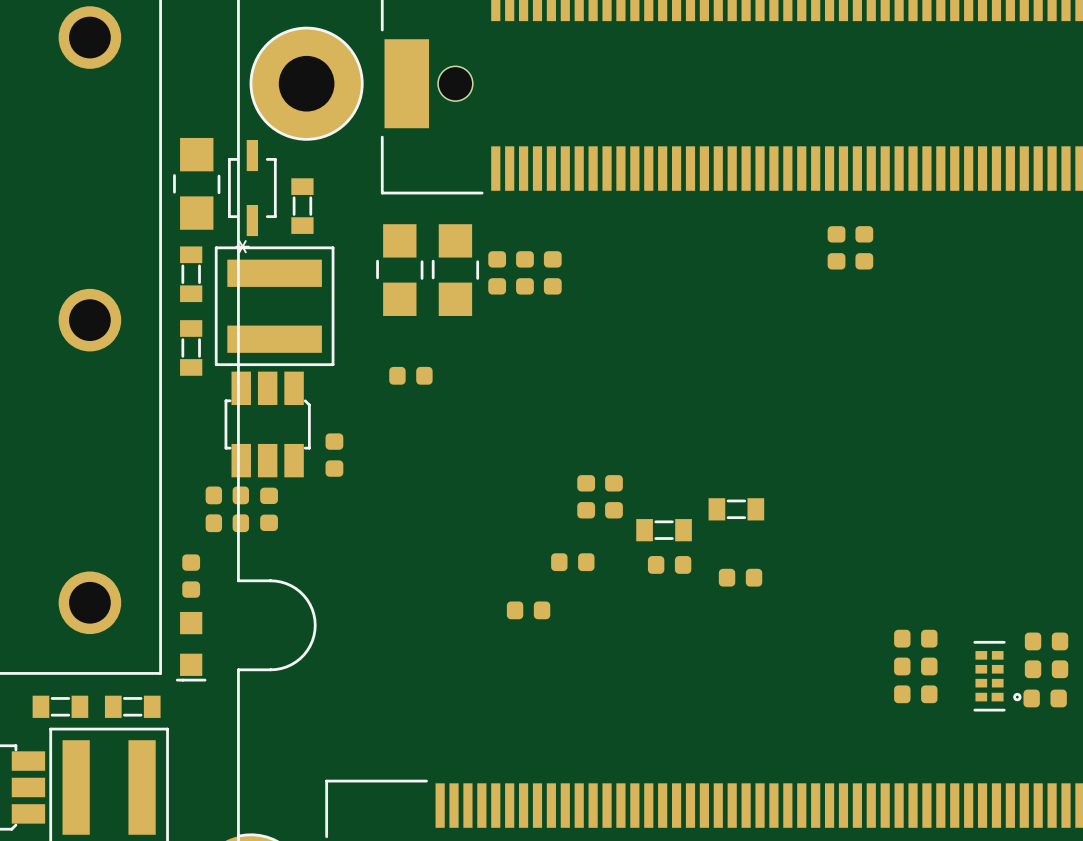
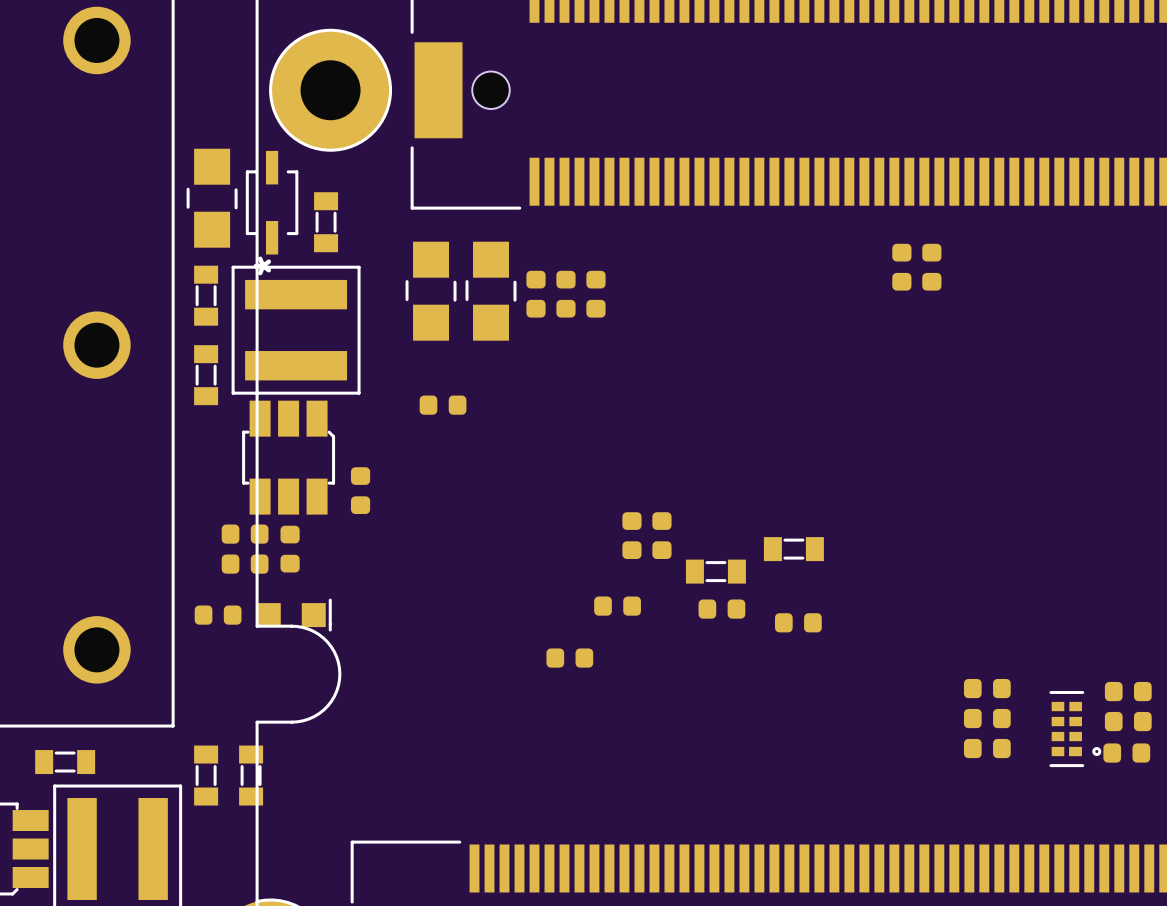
part rotation: 0° (191, 576) -> 90° clockwise (218, 615)
part rotation: 0° (191, 646) -> 90° counterclockwise (294, 615)
part position: (191, 646) -> (294, 615)
part: (132, 706) -> none
part: none -> (206, 775)
part: none -> (251, 775)

